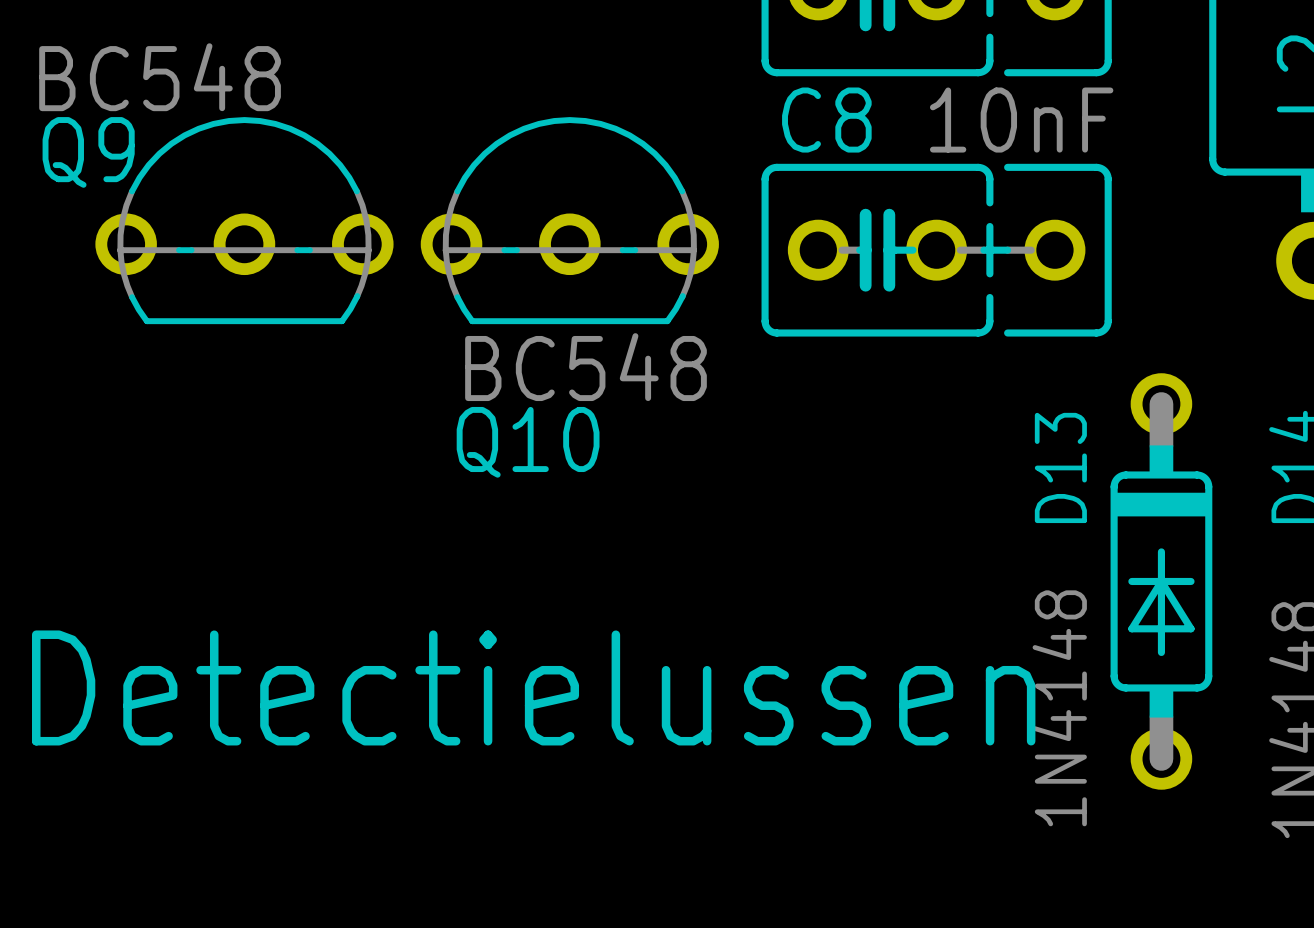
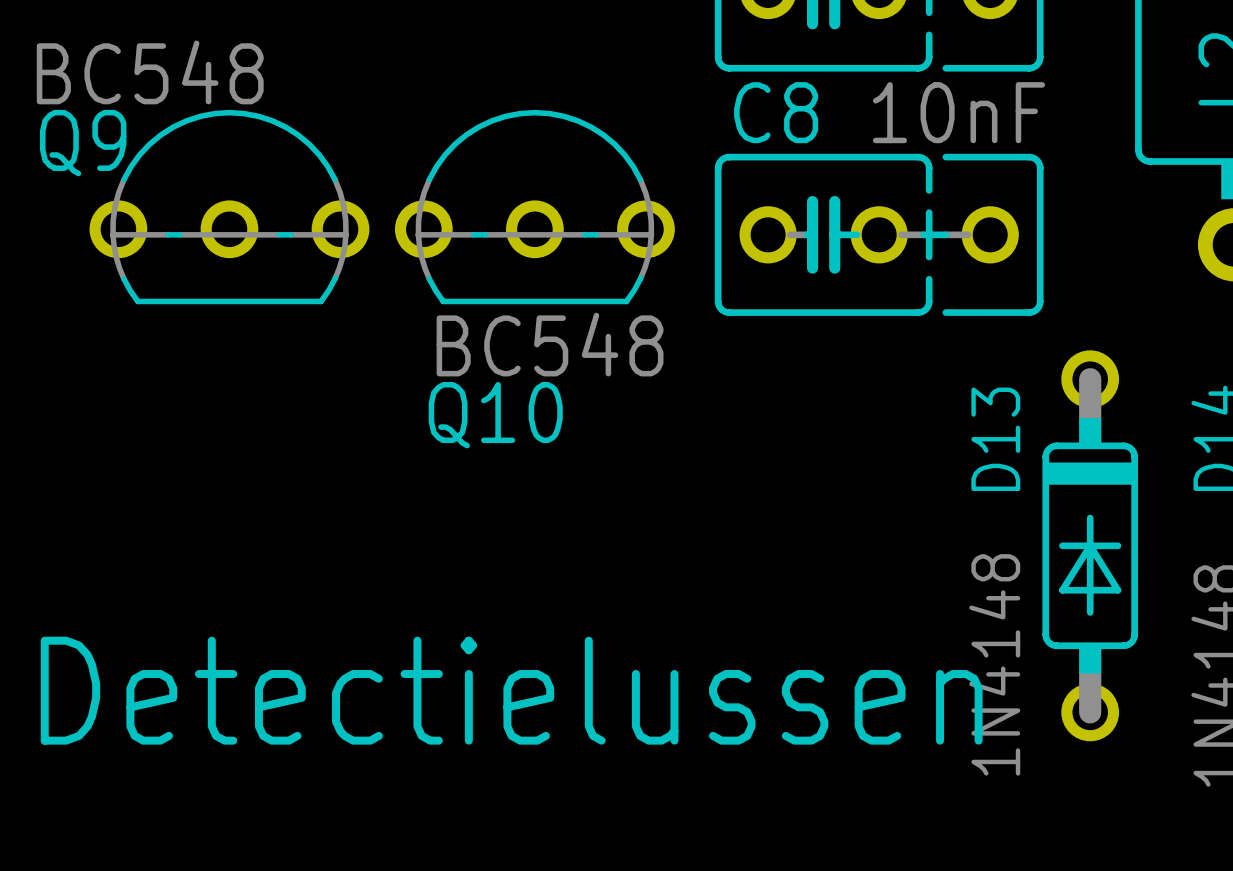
text position: Detectielussen (533, 687) -> Detectielussen (511, 690)

